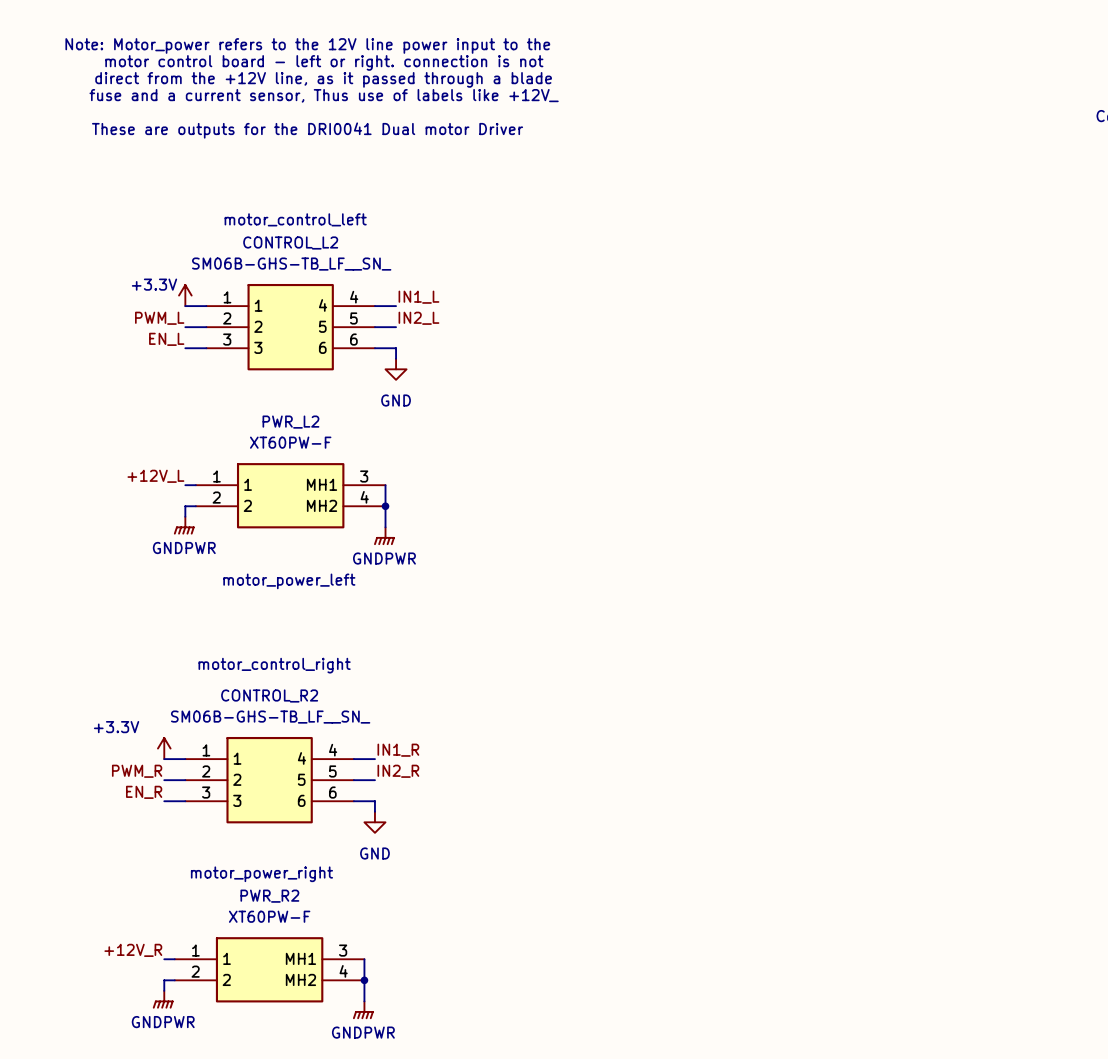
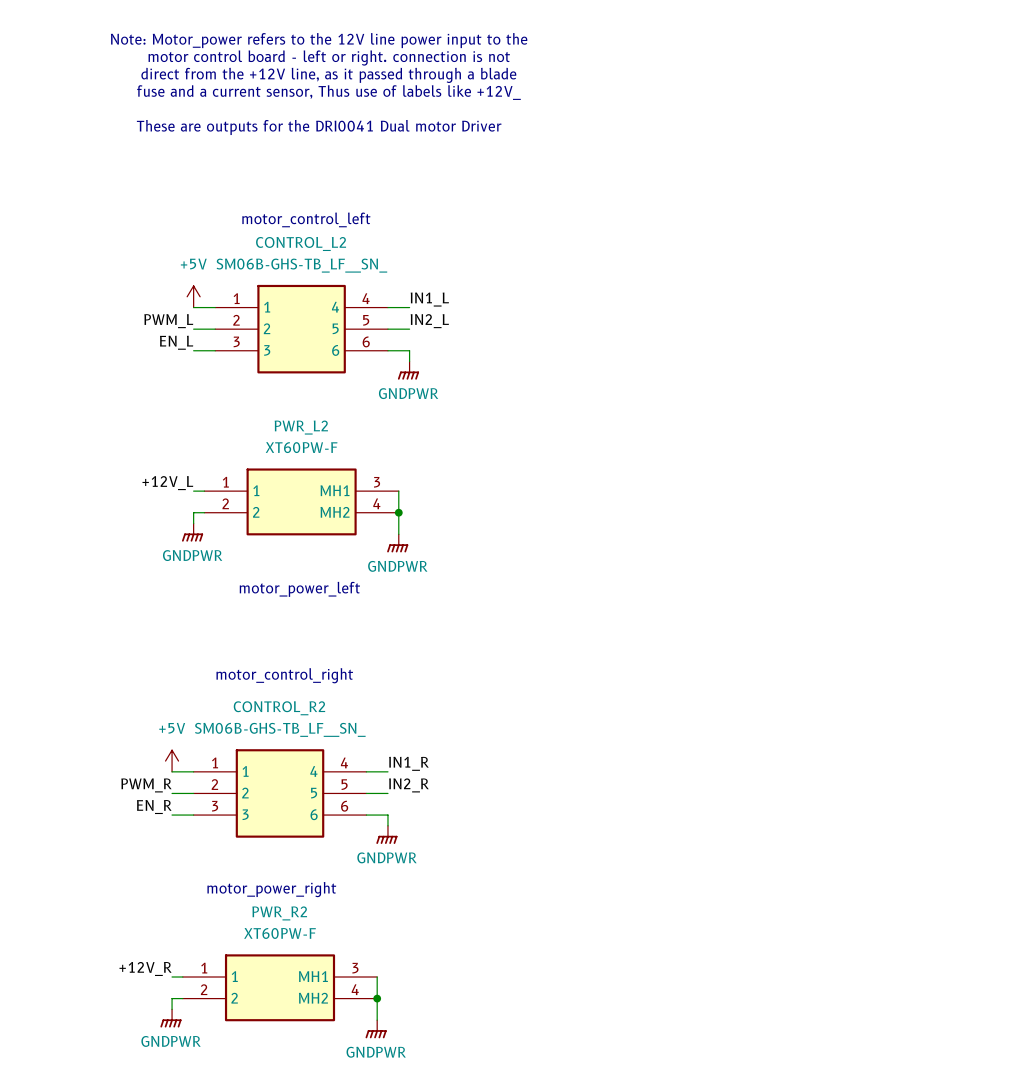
power symbol: +3.3V (185, 295) -> +5V (193, 296)
power symbol: GND (396, 369) -> GNDPWR (408, 370)
power symbol: +3.3V (164, 748) -> +5V (172, 761)
power symbol: GND (374, 822) -> GNDPWR (386, 834)

